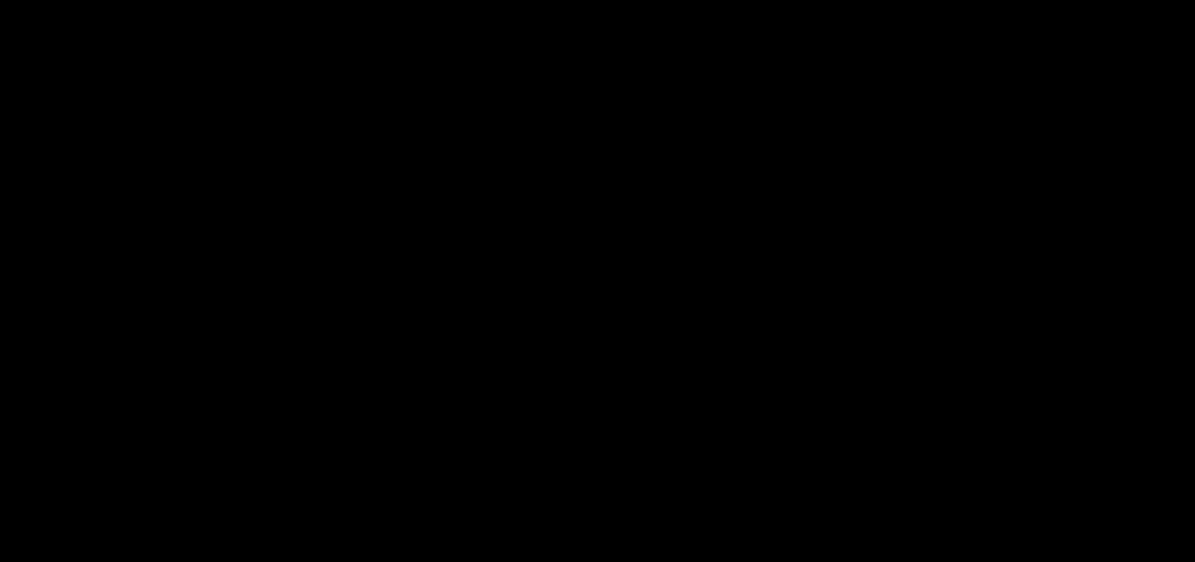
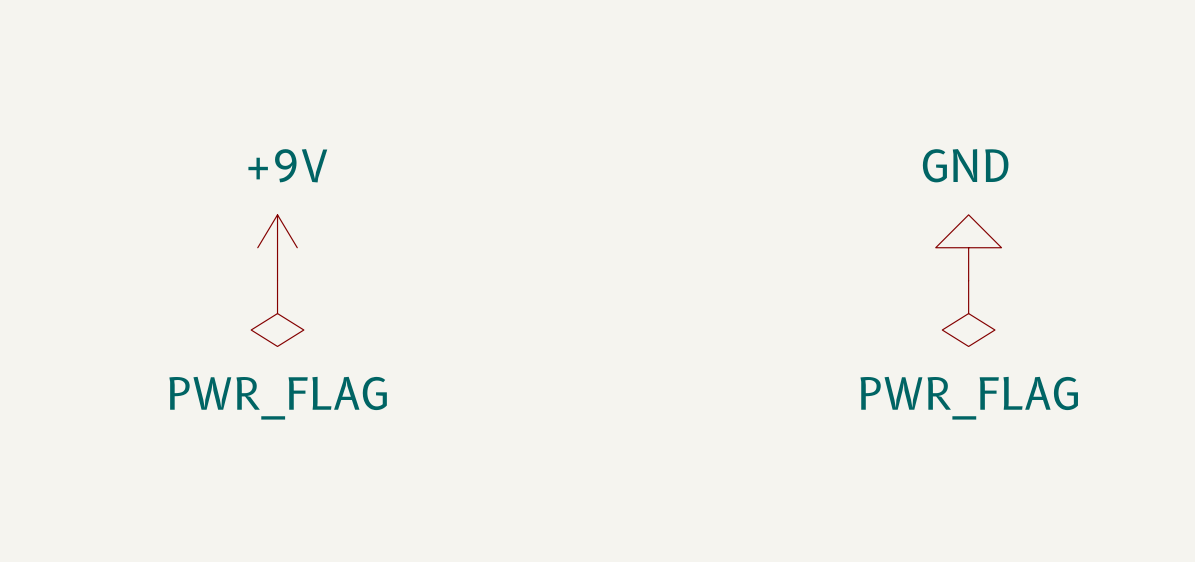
power symbol: none -> +9V (277, 247)
power symbol: none -> GND (968, 247)
power symbol: none -> PWR_FLAG (277, 313)
power symbol: none -> PWR_FLAG (968, 313)

